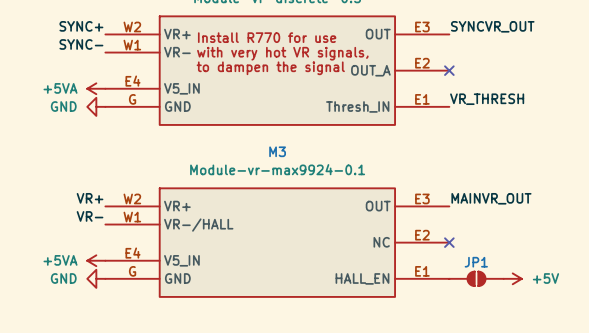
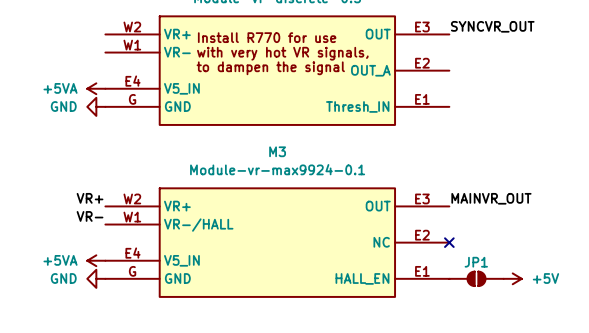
label: SYNC+ (81, 26) -> none
label: SYNC- (81, 44) -> none
no-connect mark: (449, 70) -> none
label: VR_THRESH (487, 99) -> none

